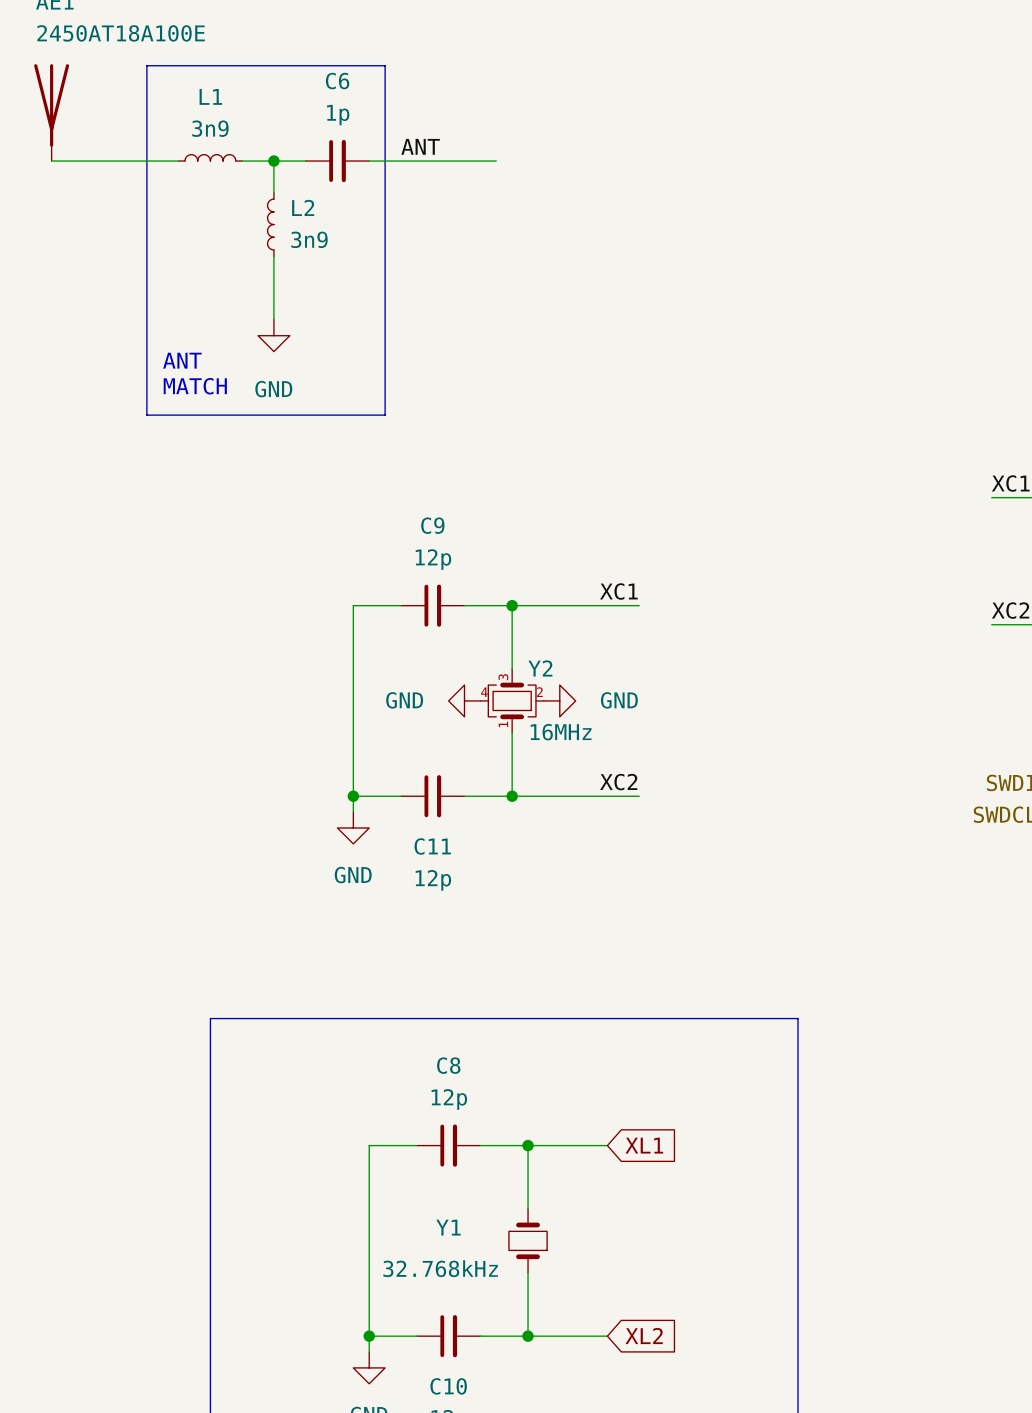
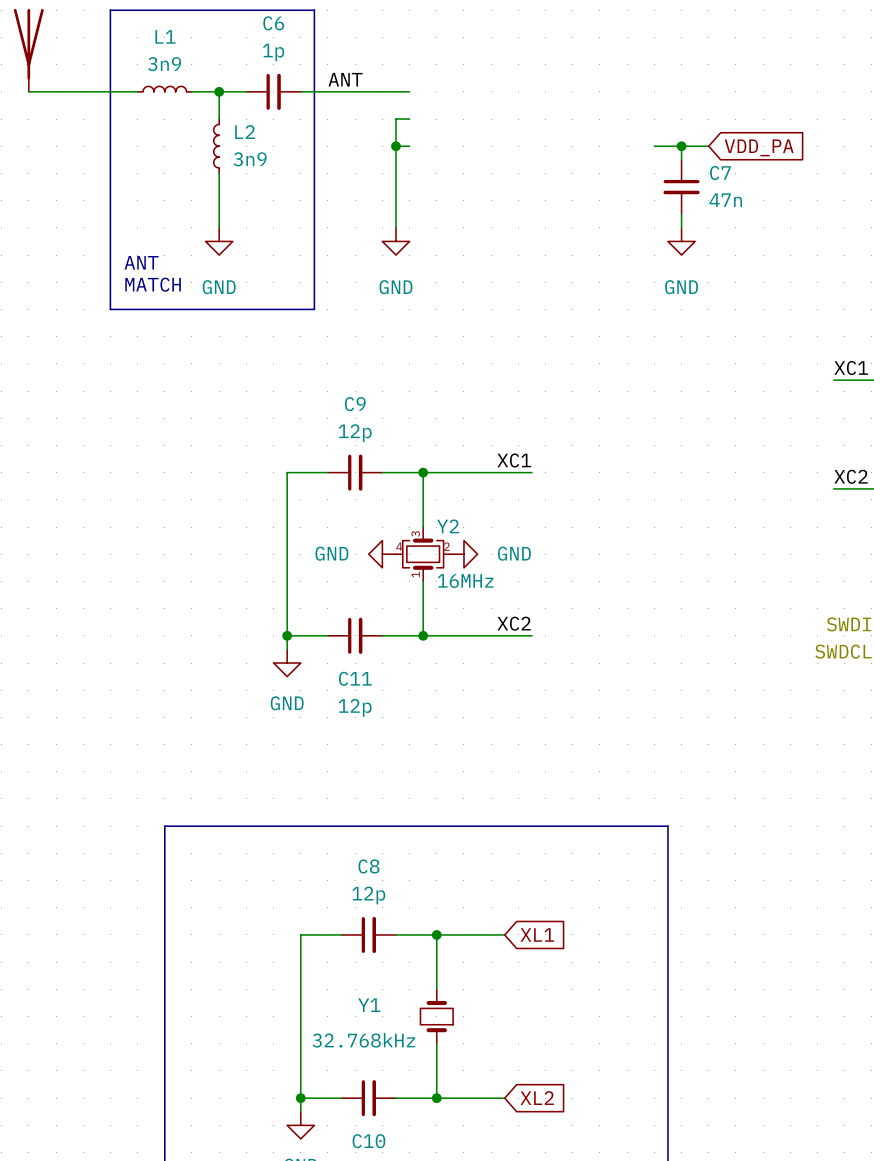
wire: none -> (409, 119) (395, 119) (395, 227)
wire: none -> (395, 146) (409, 146)
junction: none -> (395, 146)
wire: none -> (654, 146) (708, 146)
wire: none -> (681, 146) (681, 159)
junction: none -> (681, 146)
global label: none -> VDD_PA (759, 147)
C7: none -> 47n (681, 187)
wire: none -> (681, 214) (681, 227)
power symbol: none -> GND (395, 241)
power symbol: none -> GND (681, 241)

